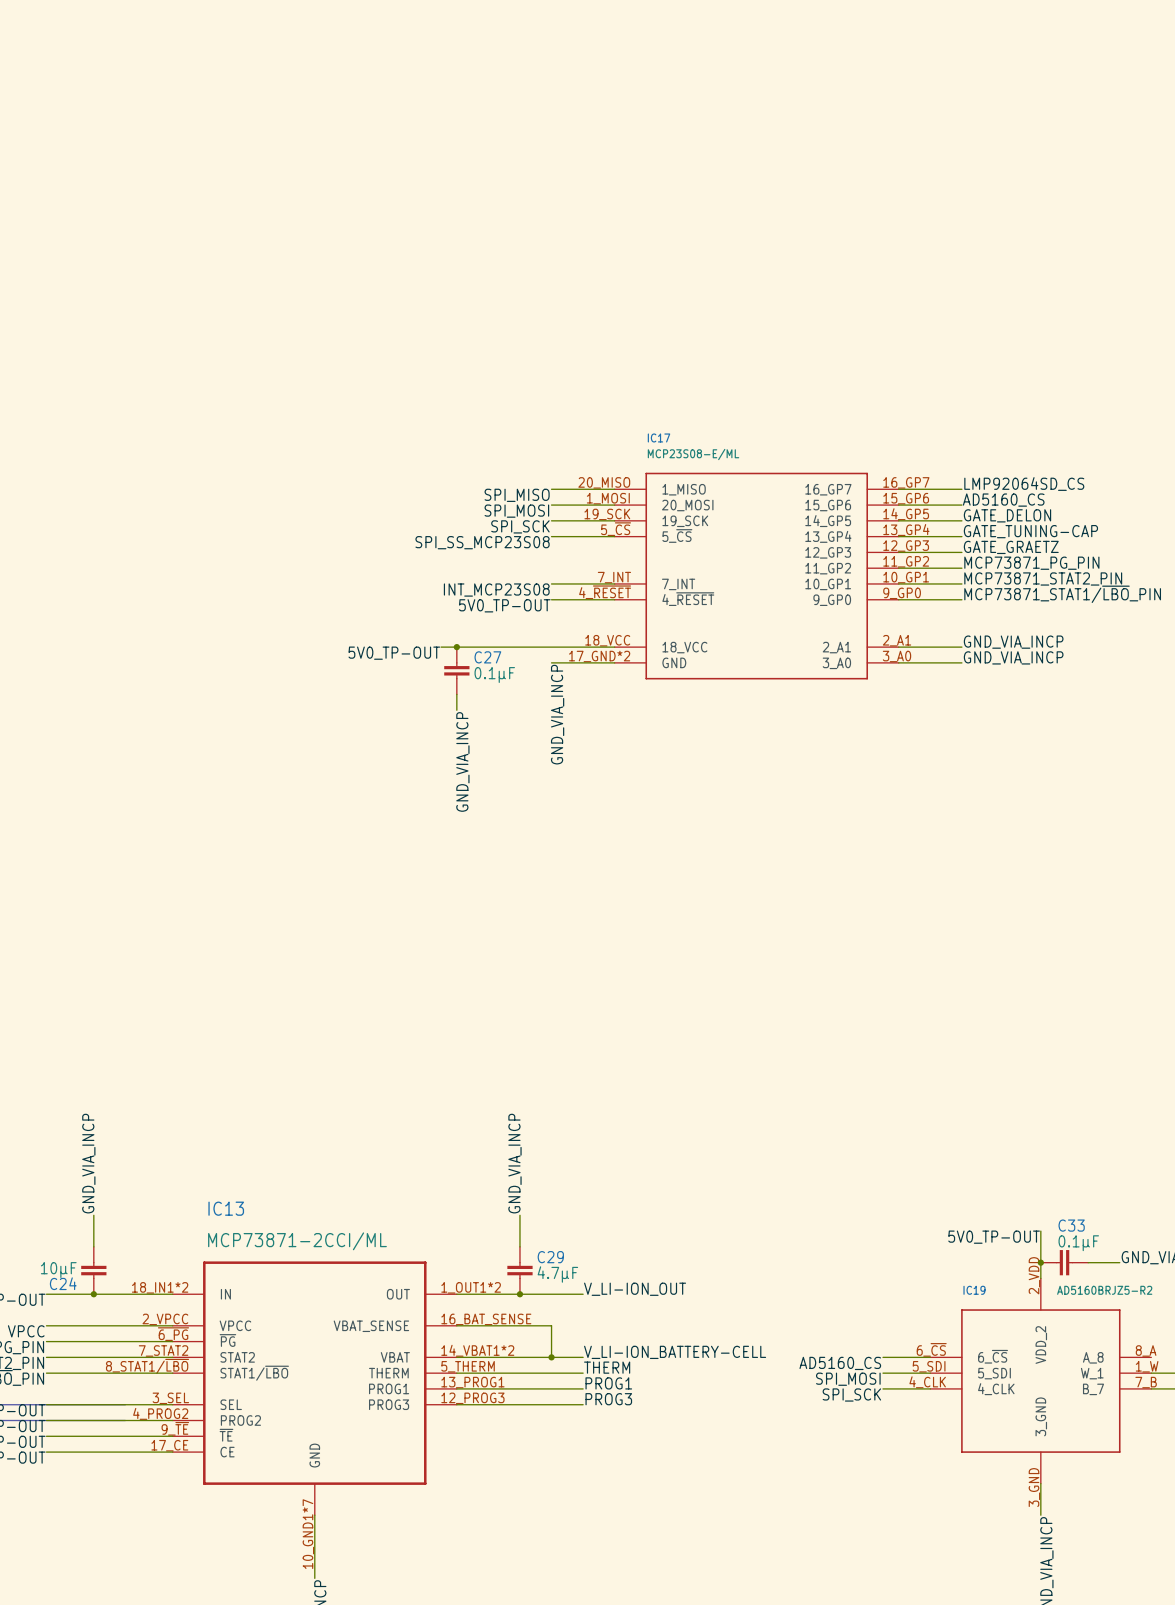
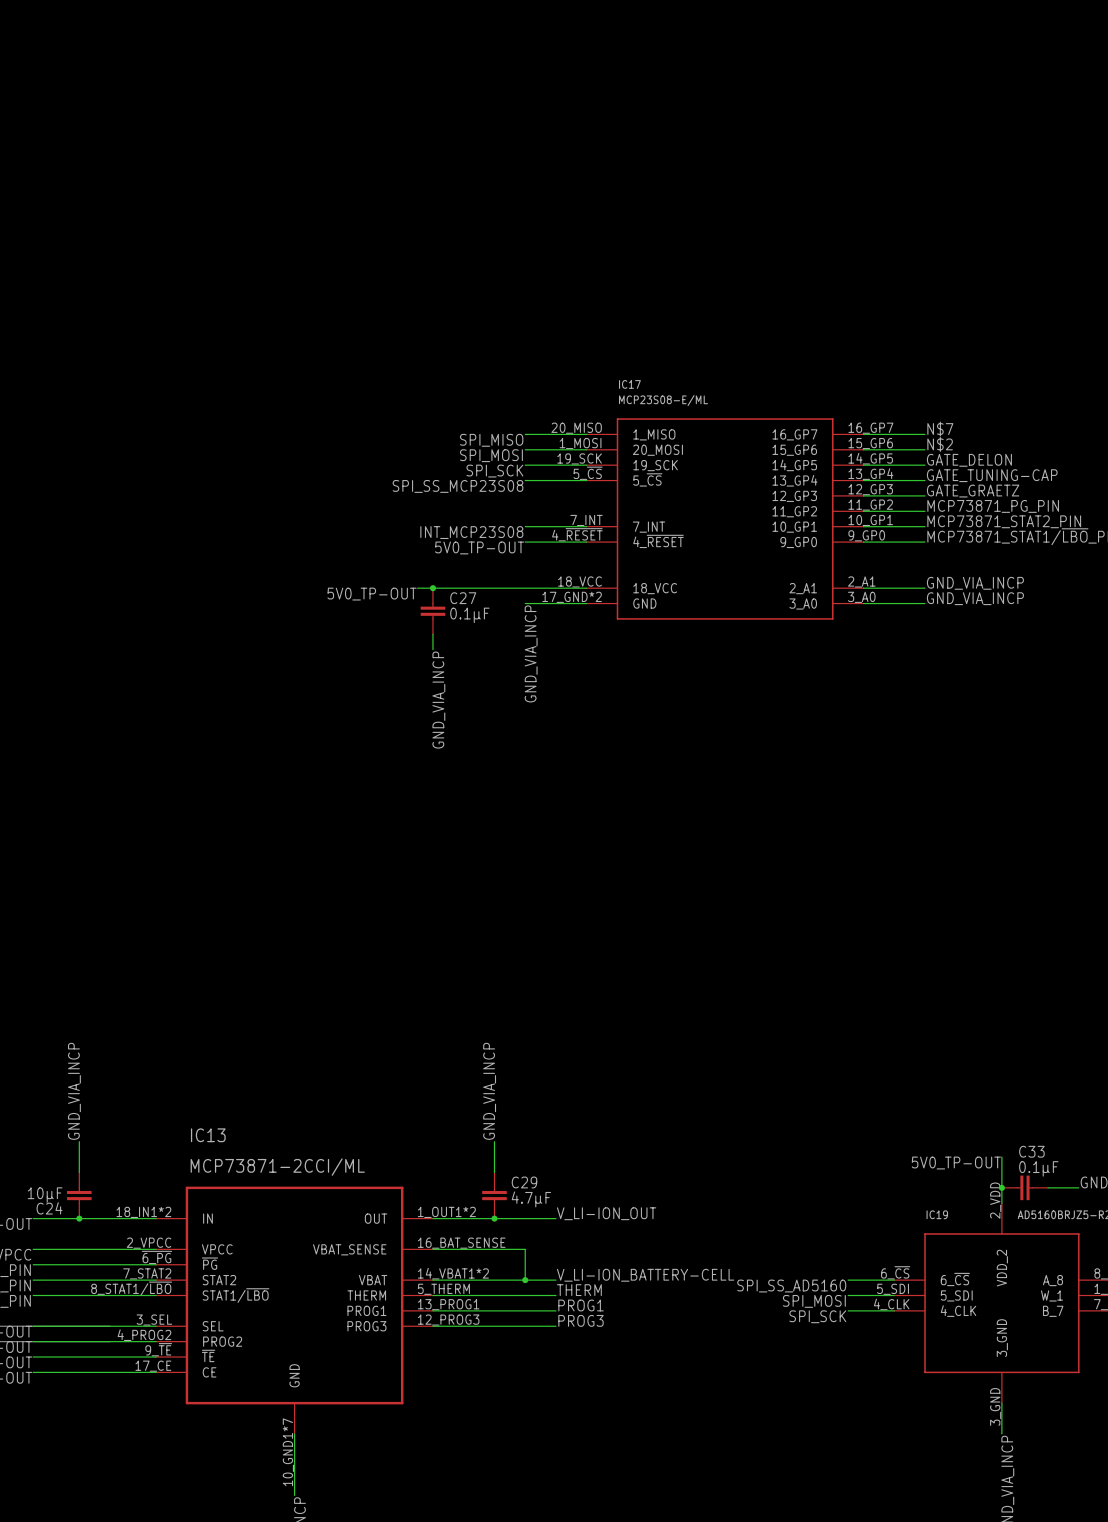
label: LMP92064SD_CS (1024, 484) -> N$7 (940, 429)
label: AD5160_CS (1003, 500) -> N$2 (940, 444)
label: AD5160_CS (840, 1363) -> SPI_SS_AD5160 (791, 1286)

